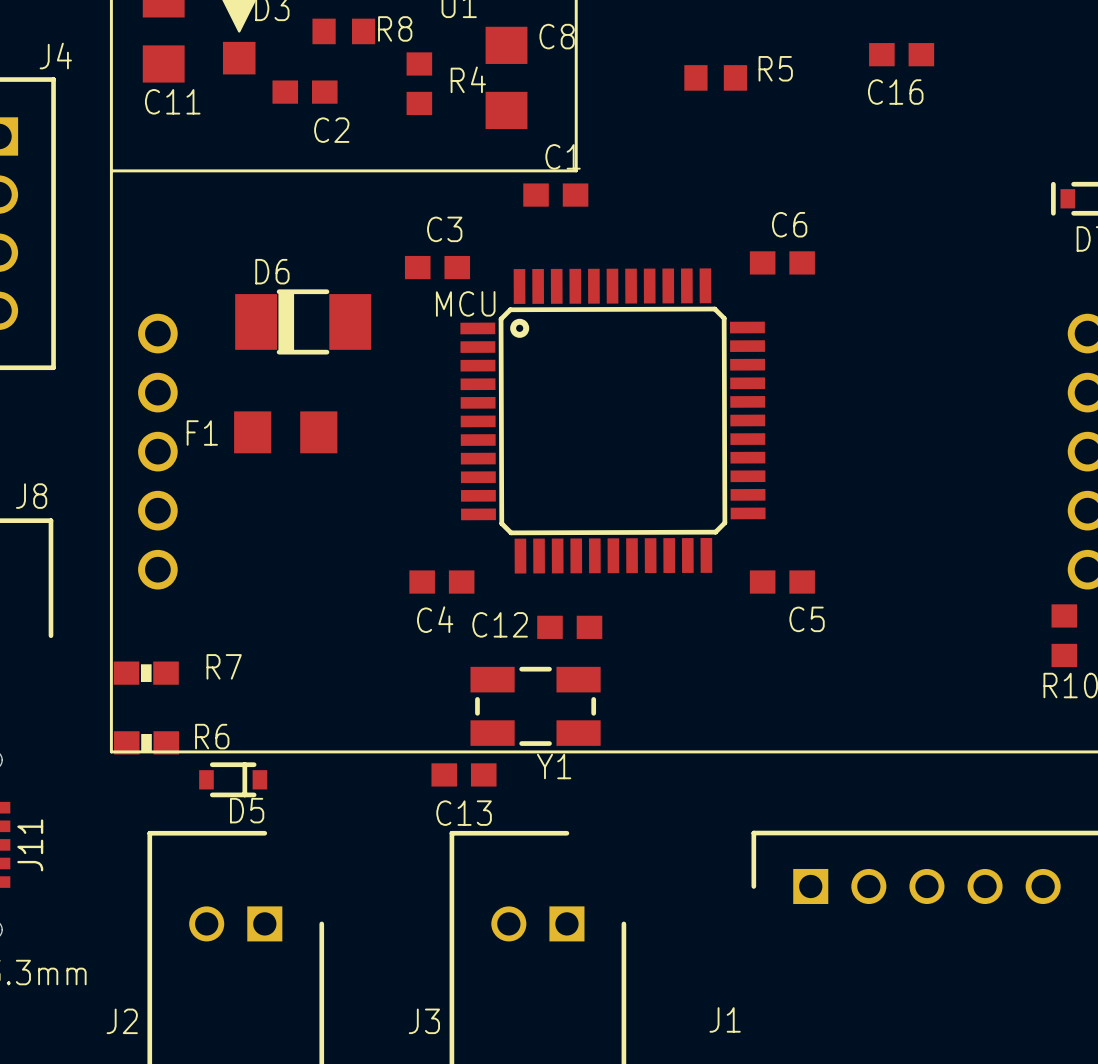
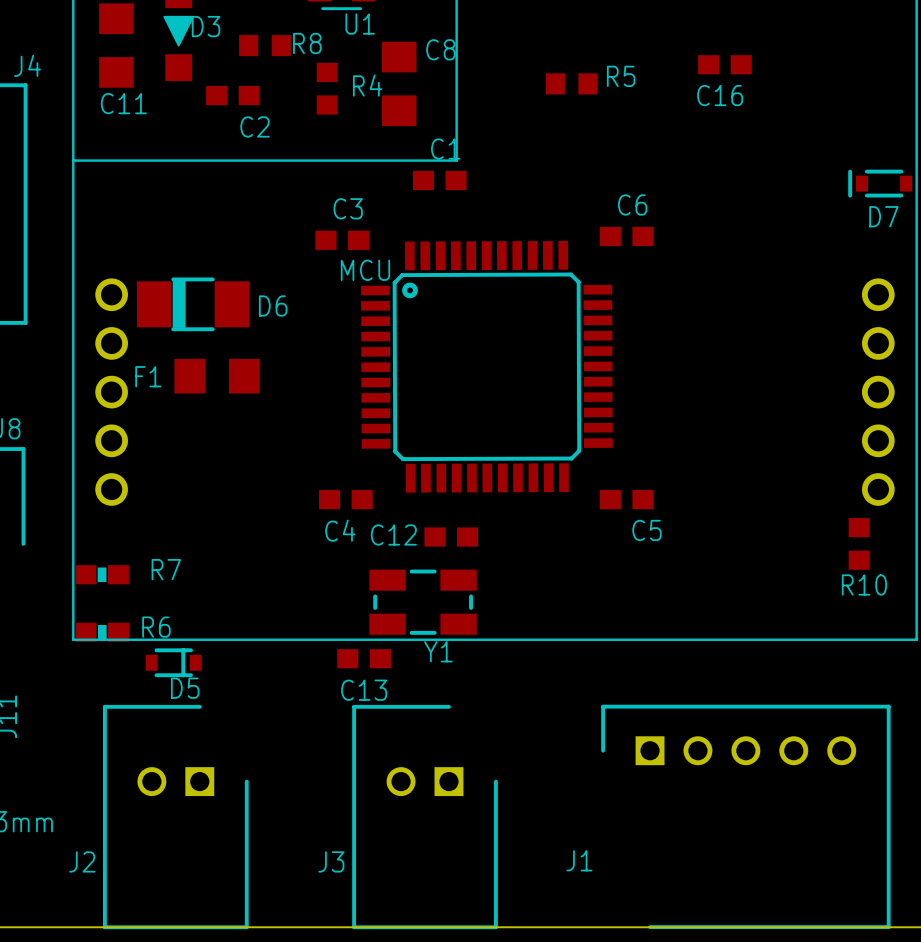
D6 name position: D6 (272, 271) -> D6 (273, 305)
D6 position: (303, 321) -> (193, 304)

